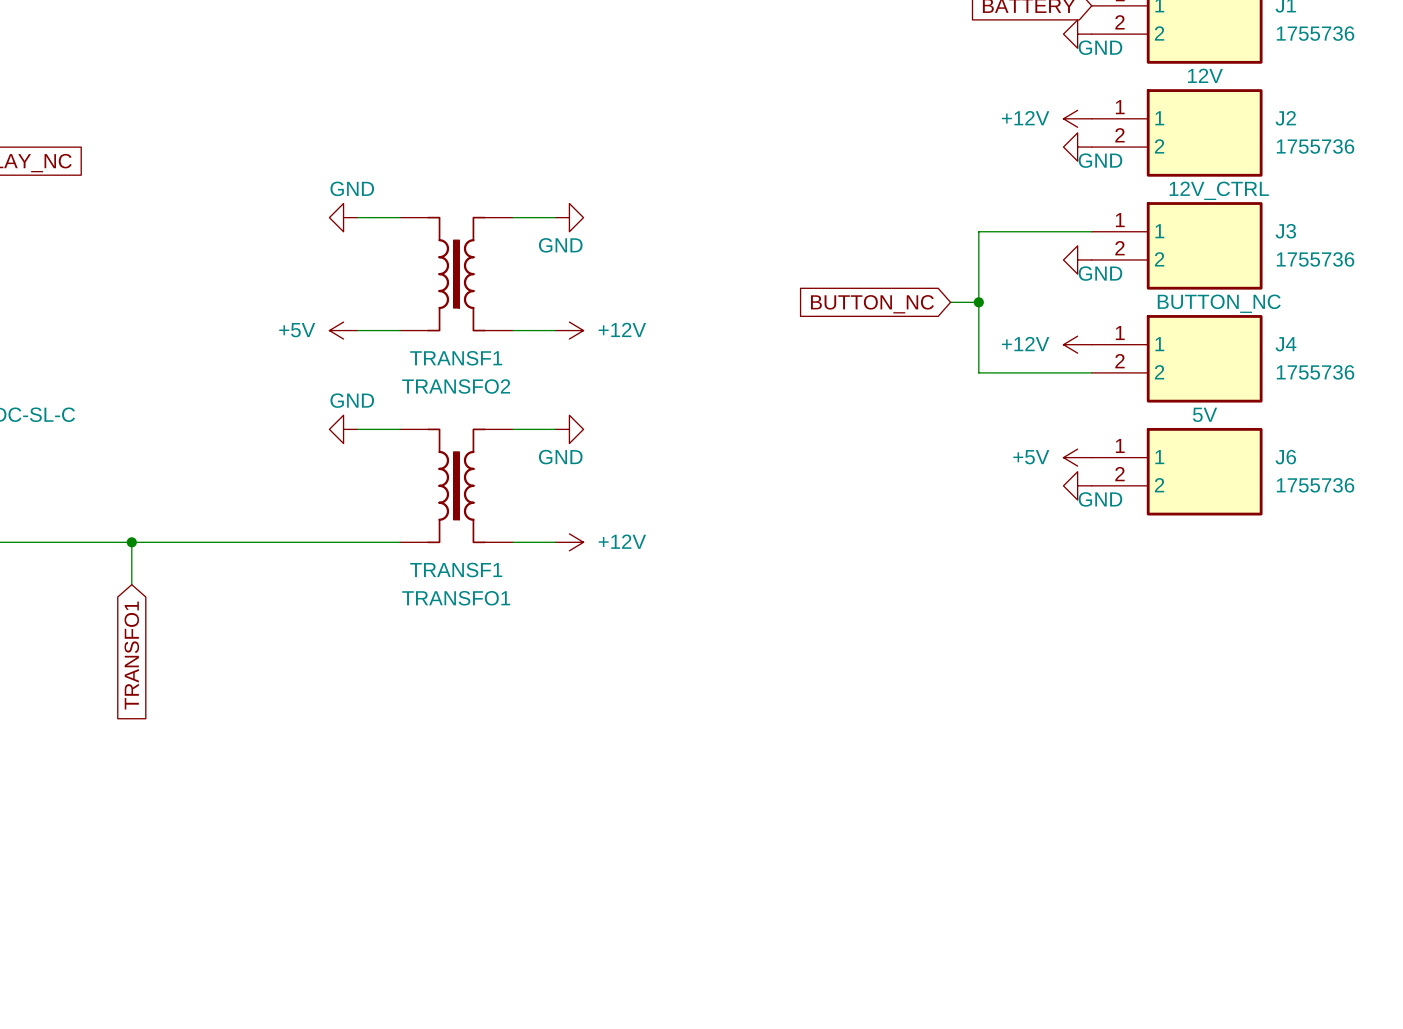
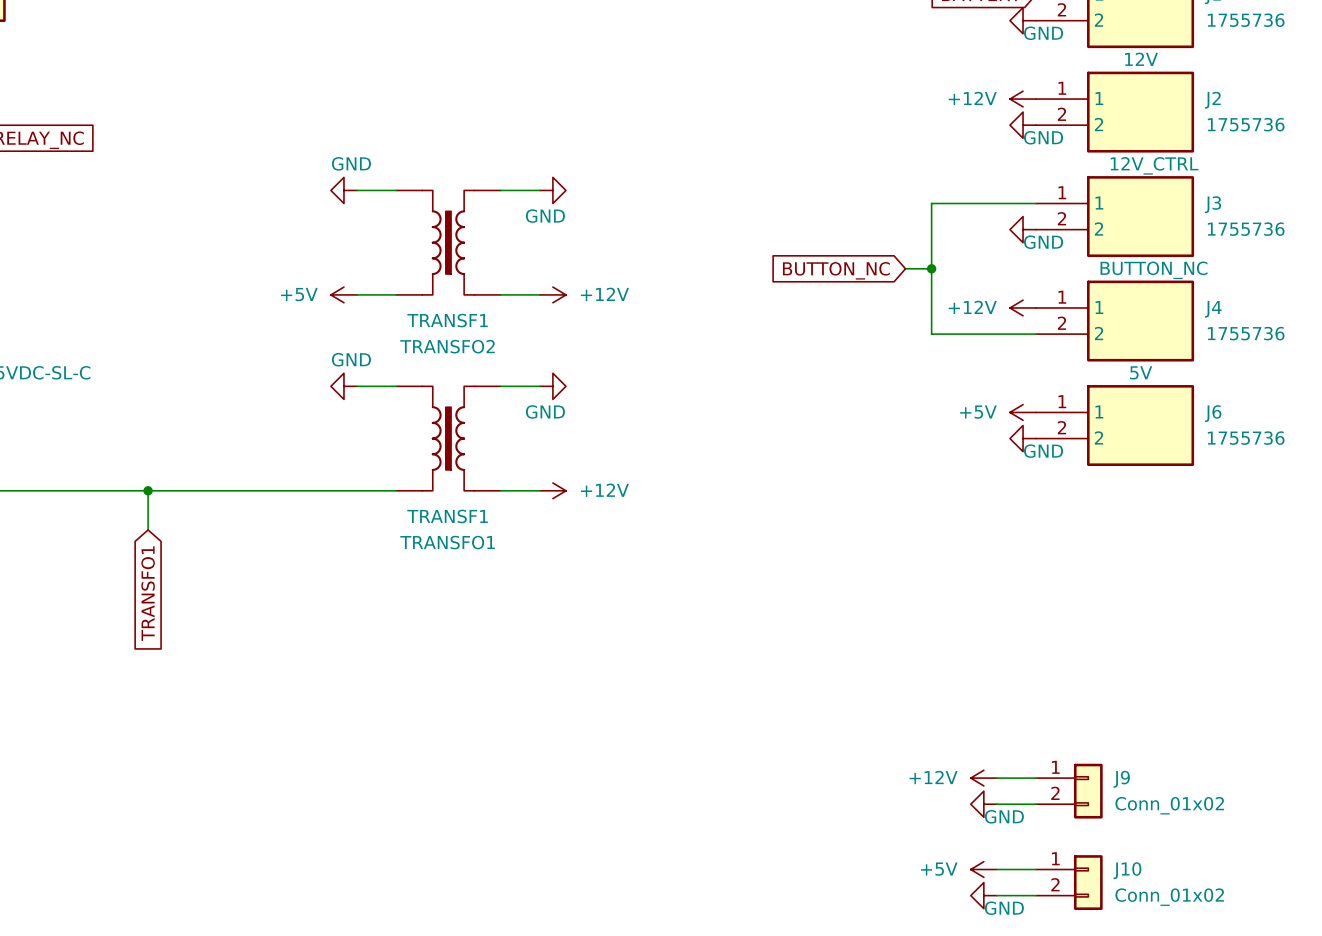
power symbol: none -> +12V (983, 778)
wire: none -> (996, 778) (1036, 778)
J9: none -> Conn_01x02 (1069, 791)
power symbol: none -> GND (983, 804)
wire: none -> (996, 804) (1036, 804)
power symbol: none -> +5V (983, 869)
wire: none -> (996, 869) (1036, 869)
J10: none -> Conn_01x02 (1069, 882)
power symbol: none -> GND (983, 895)
wire: none -> (996, 895) (1036, 895)

